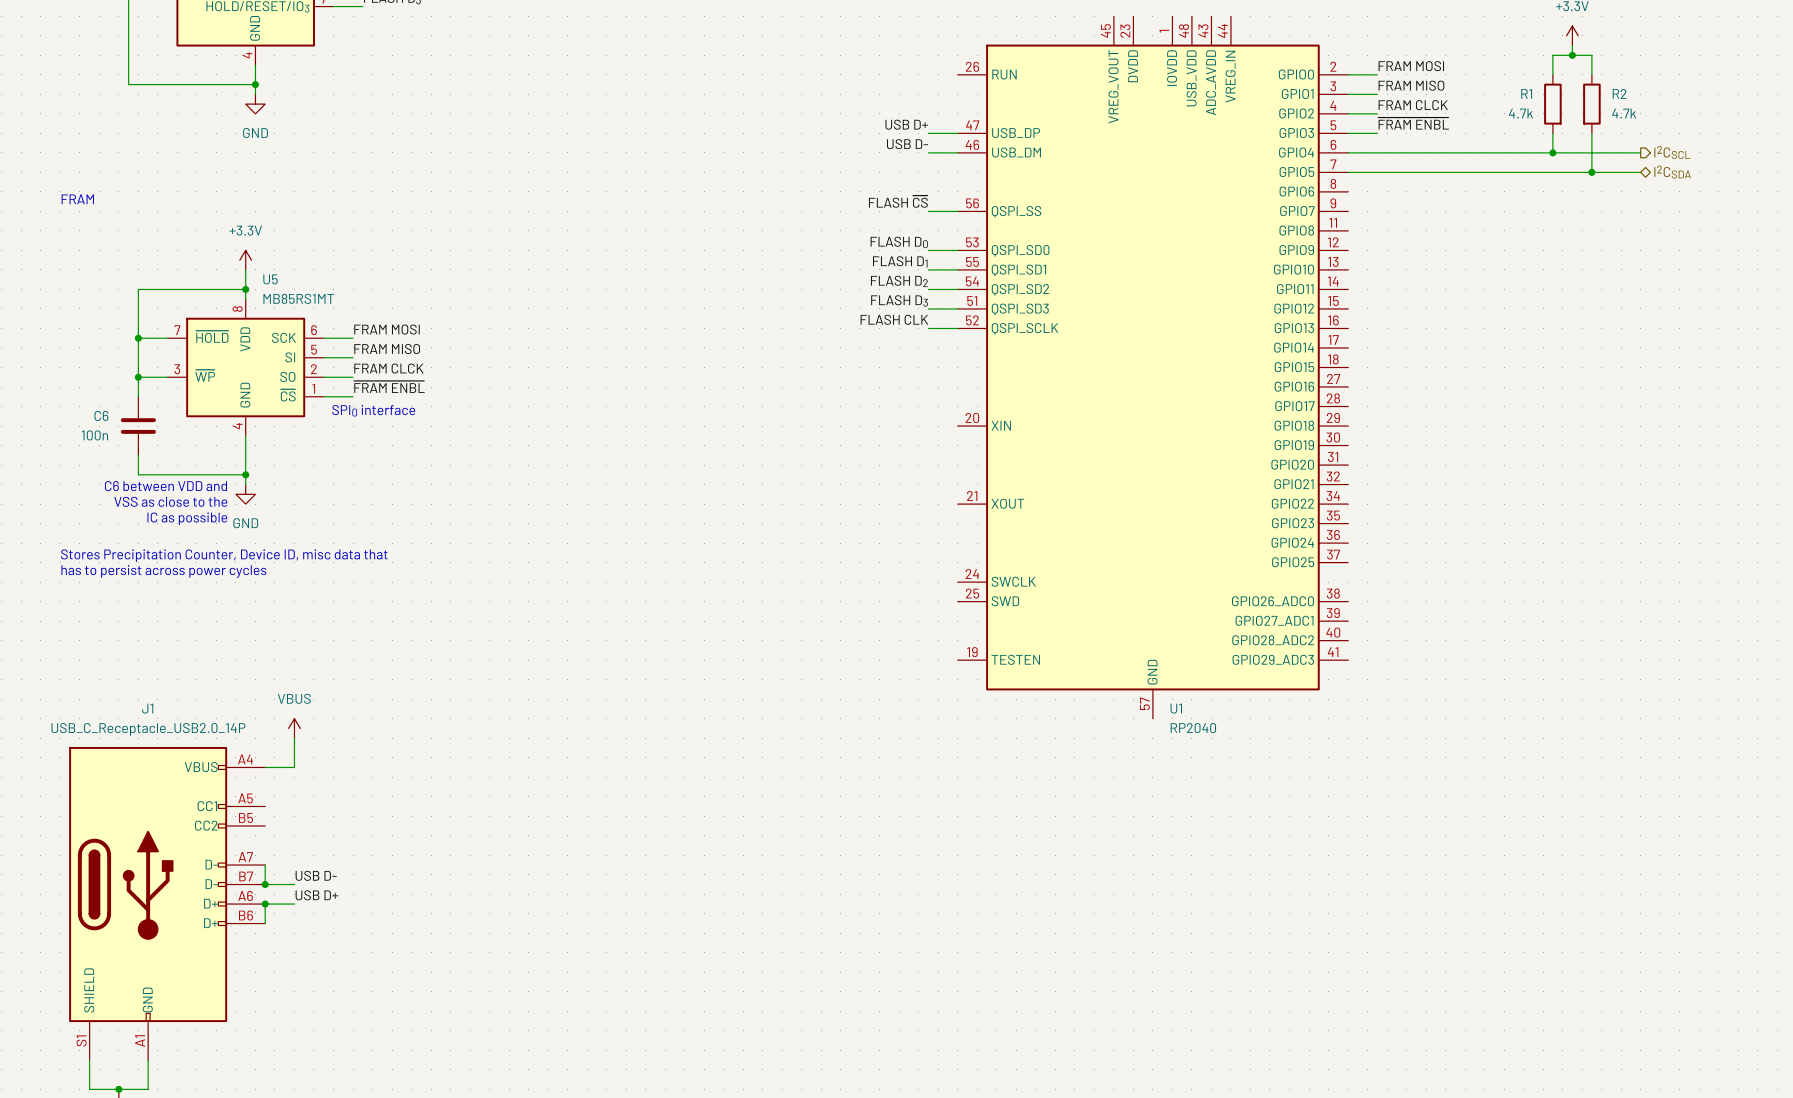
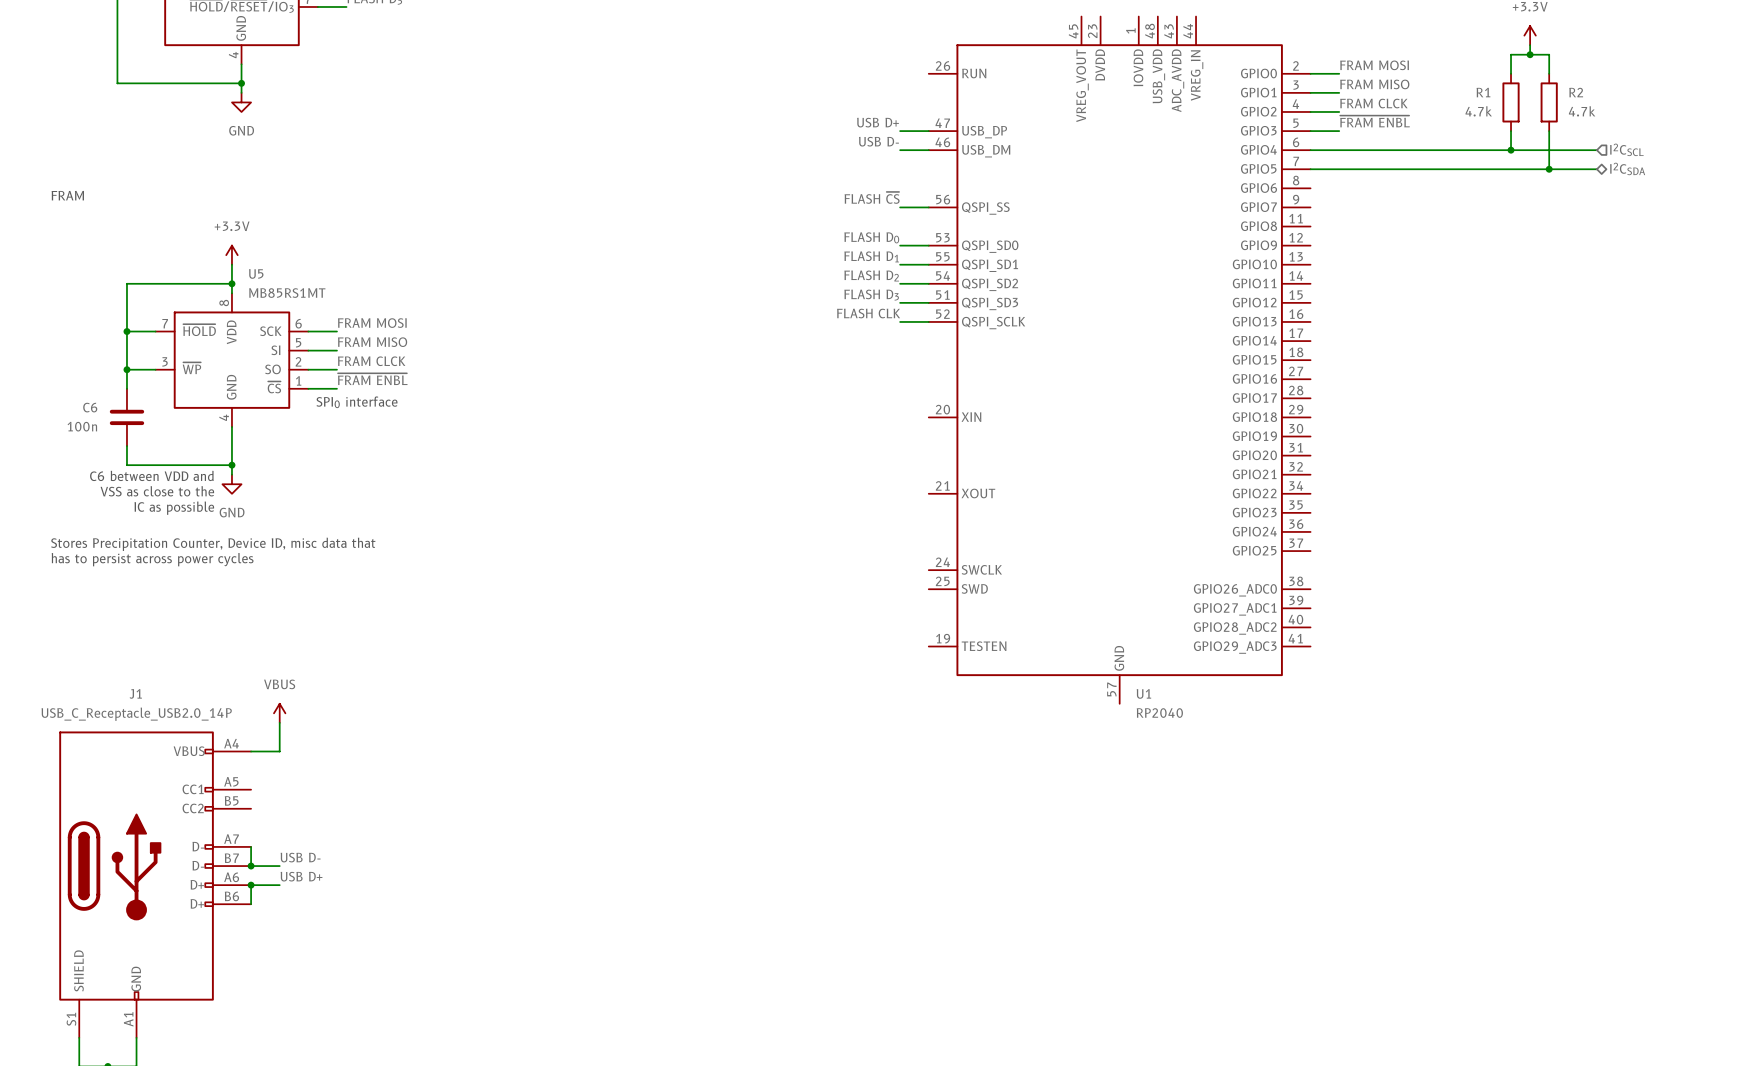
hierarchical label shape: output (1672, 152) -> input (1626, 149)

